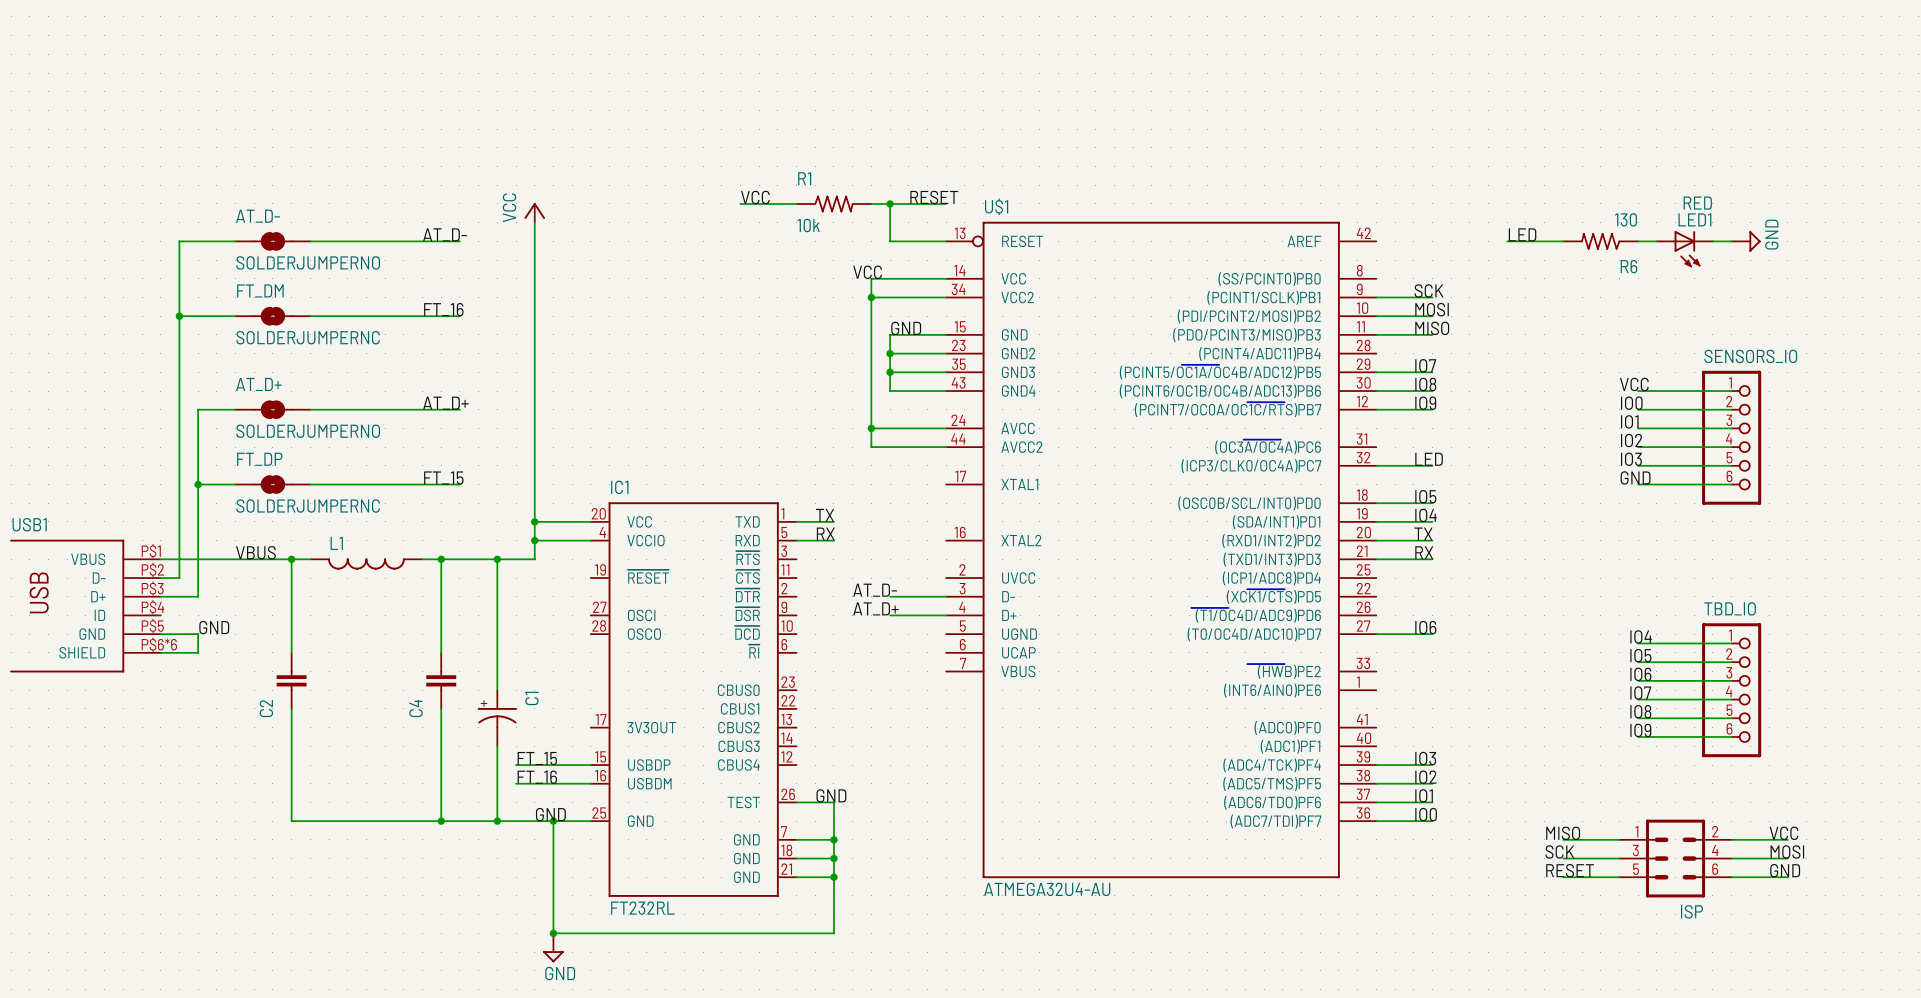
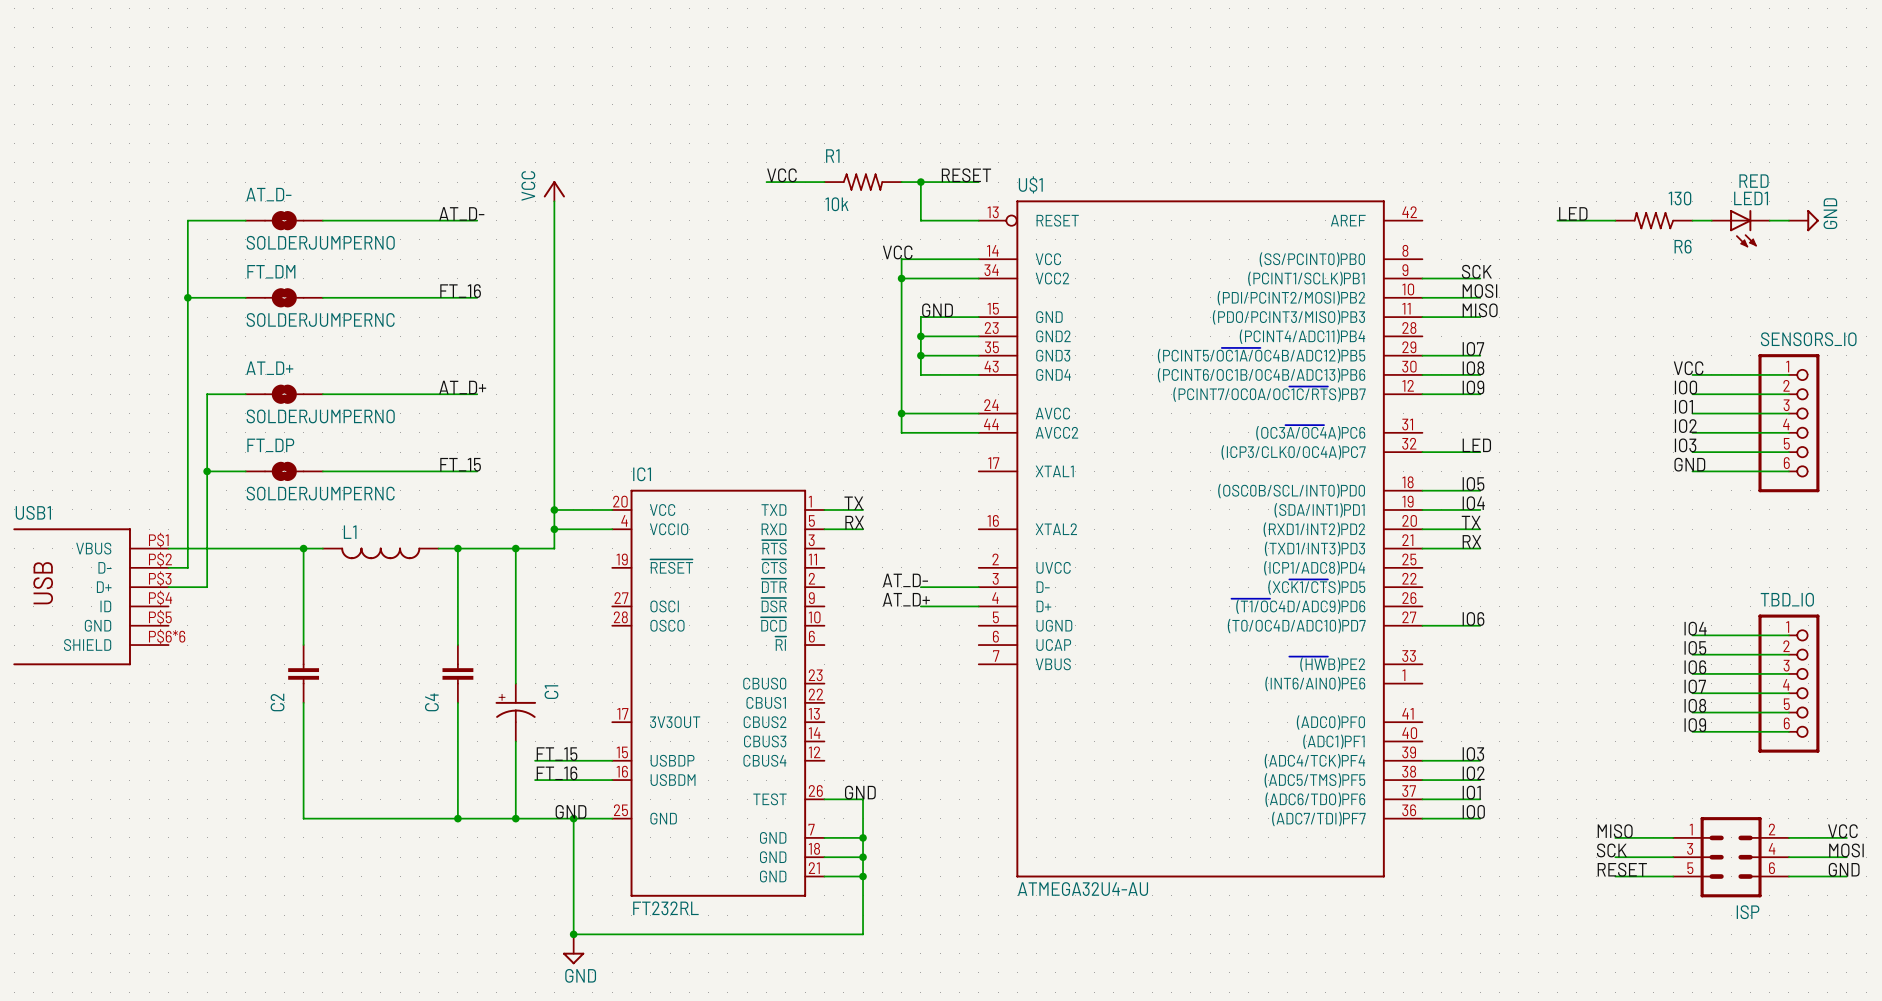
label: VBUS (255, 552) -> none
label: GND (214, 627) -> none
wire: (160, 634) (198, 634) (198, 652) (160, 652) -> none

